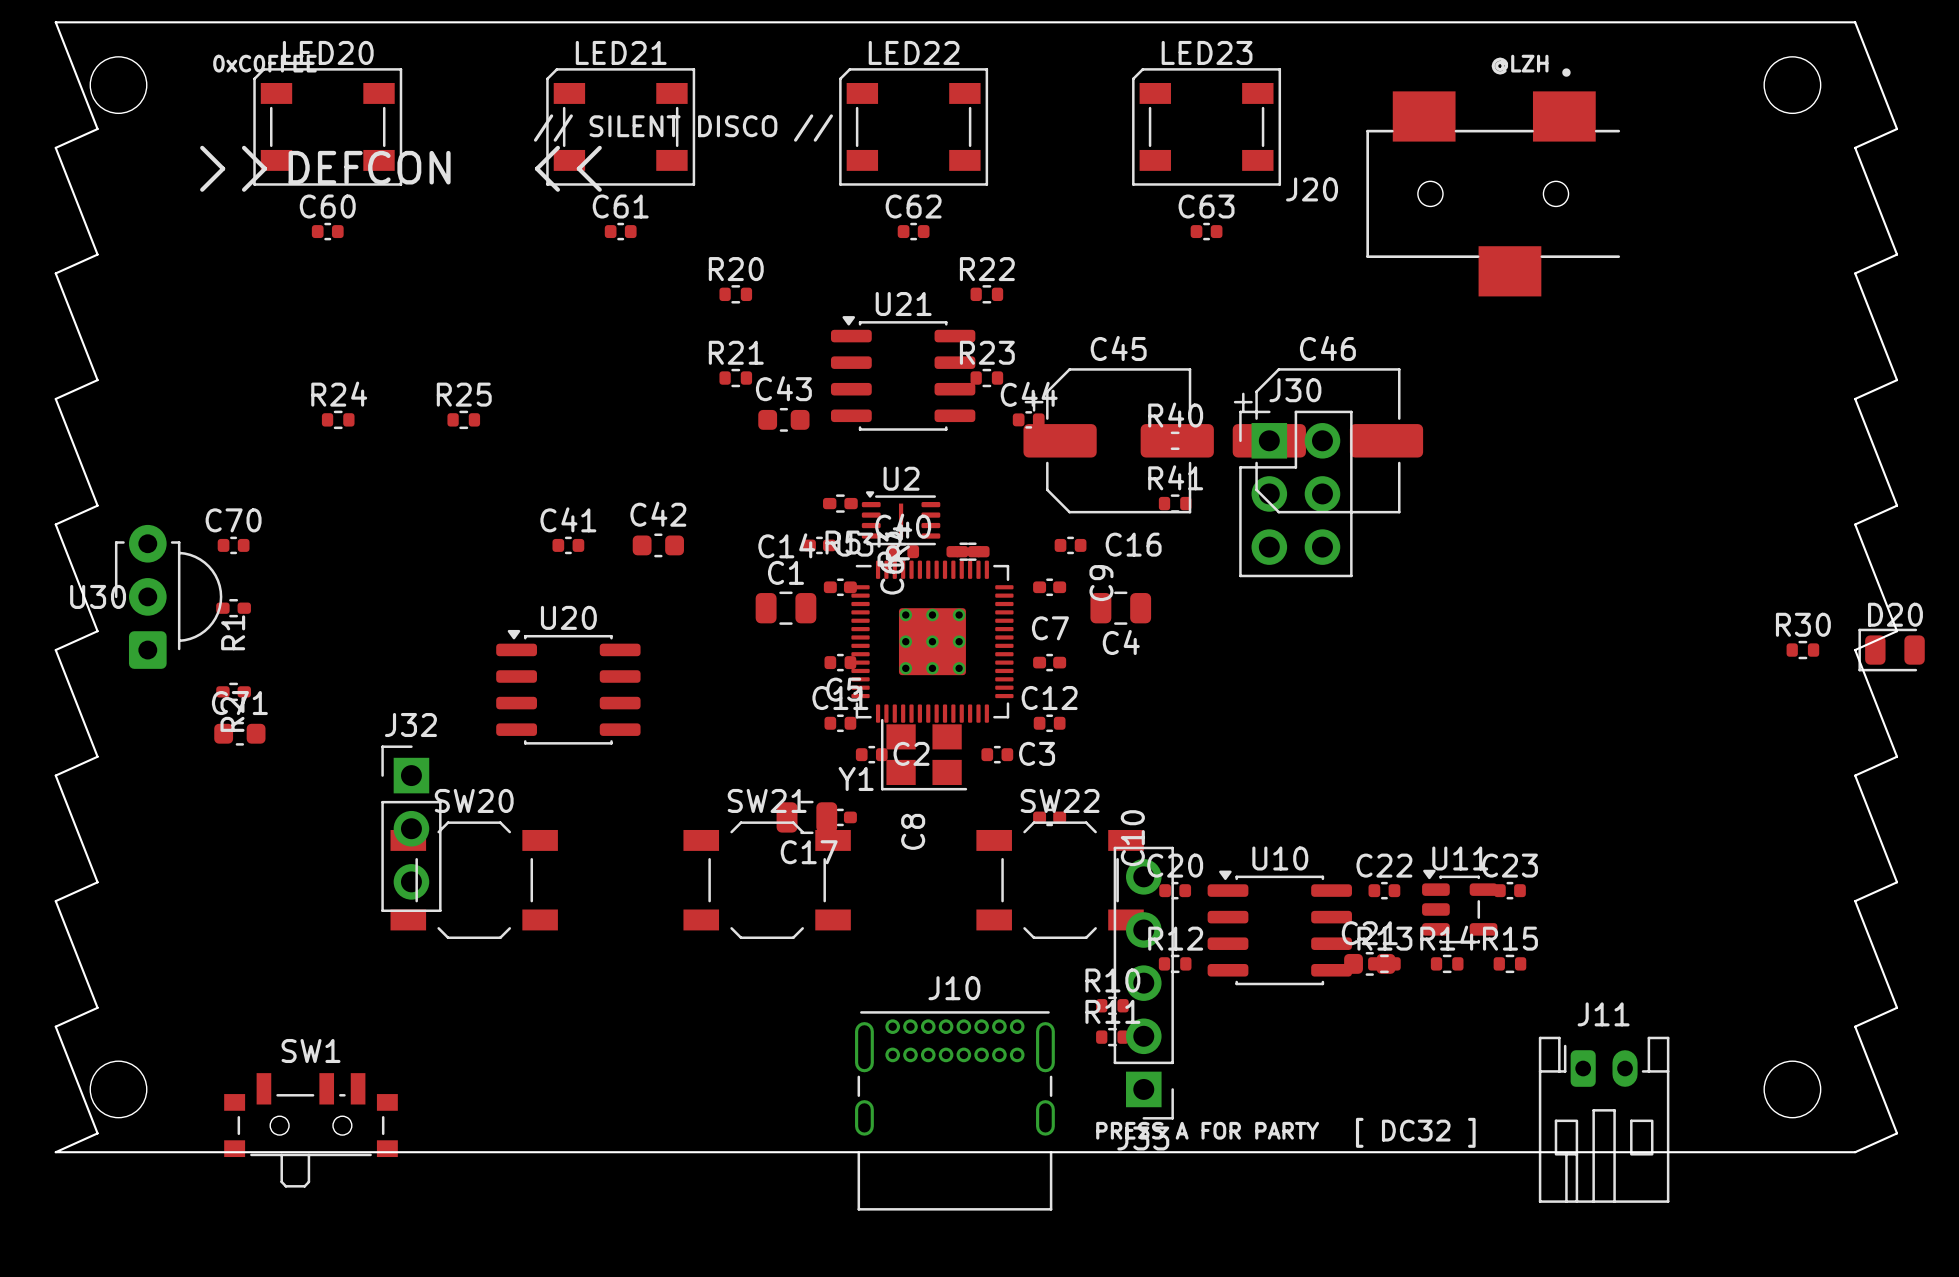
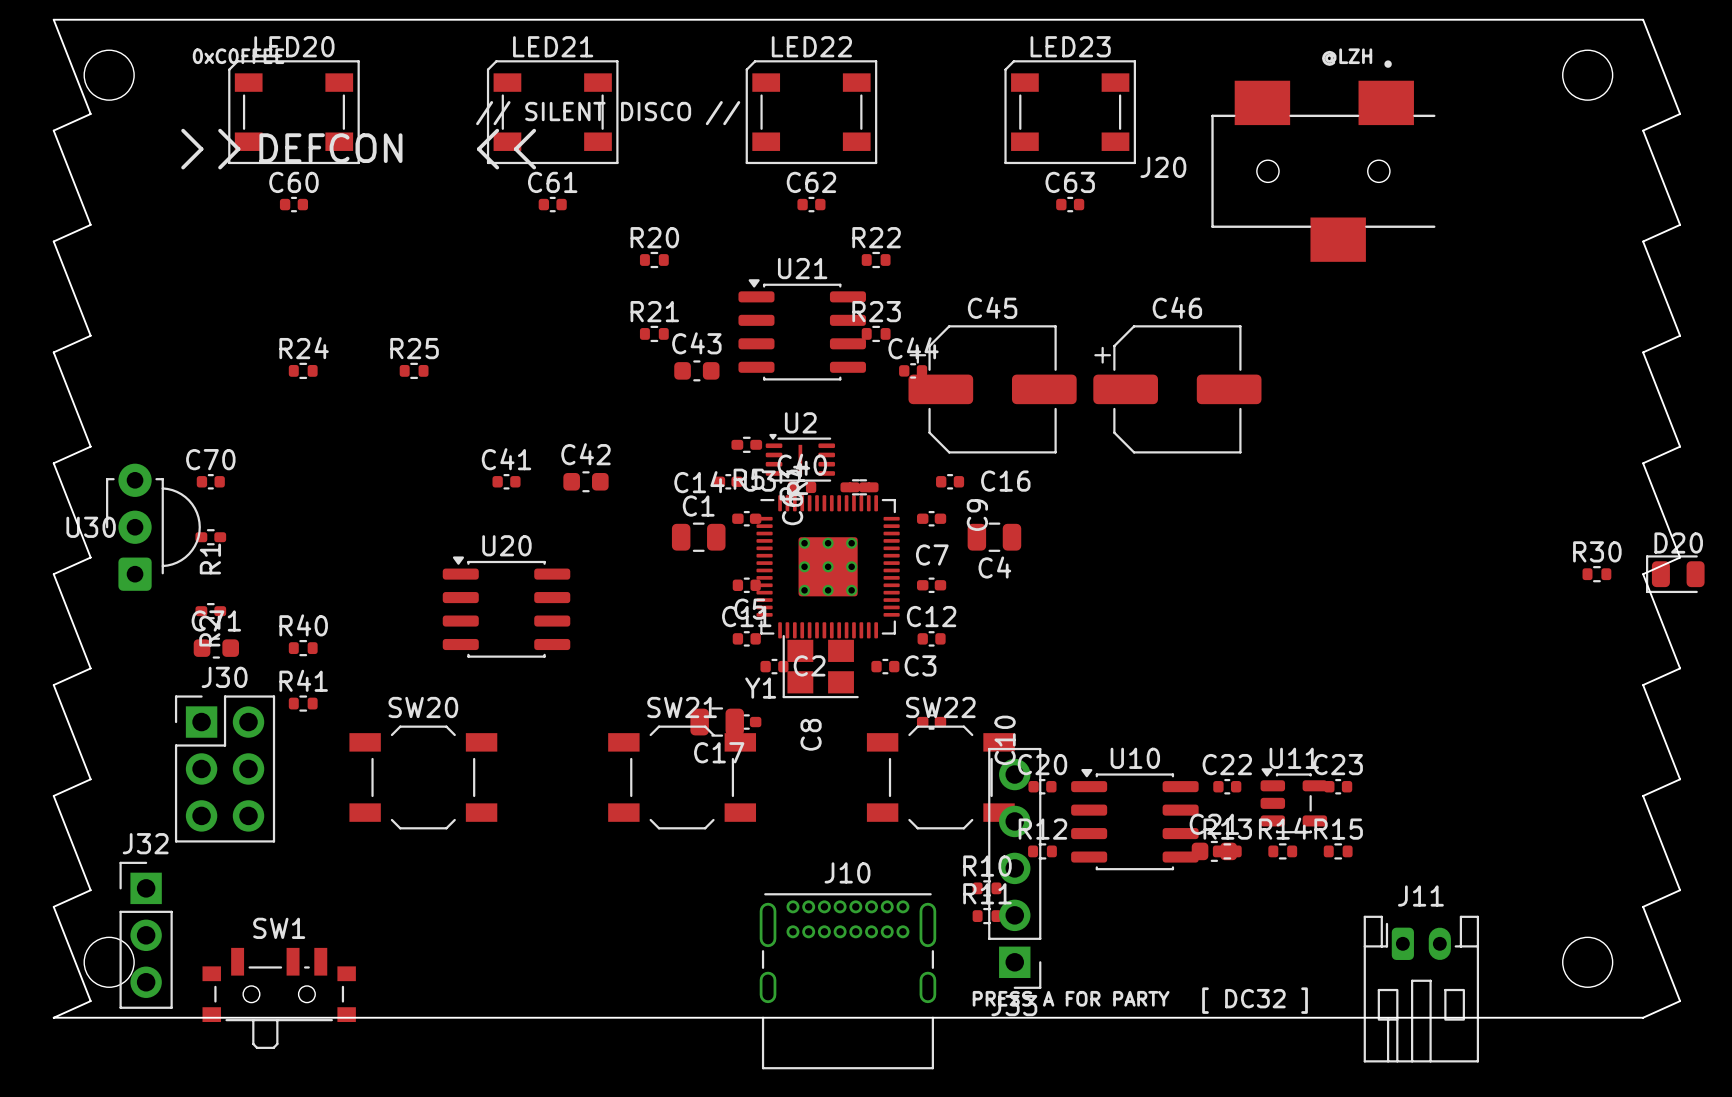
R40 position: (1175, 440) -> (303, 648)
J30 position: (1295, 493) -> (225, 768)
R41 position: (1175, 503) -> (303, 703)
J32 position: (411, 828) -> (146, 935)

